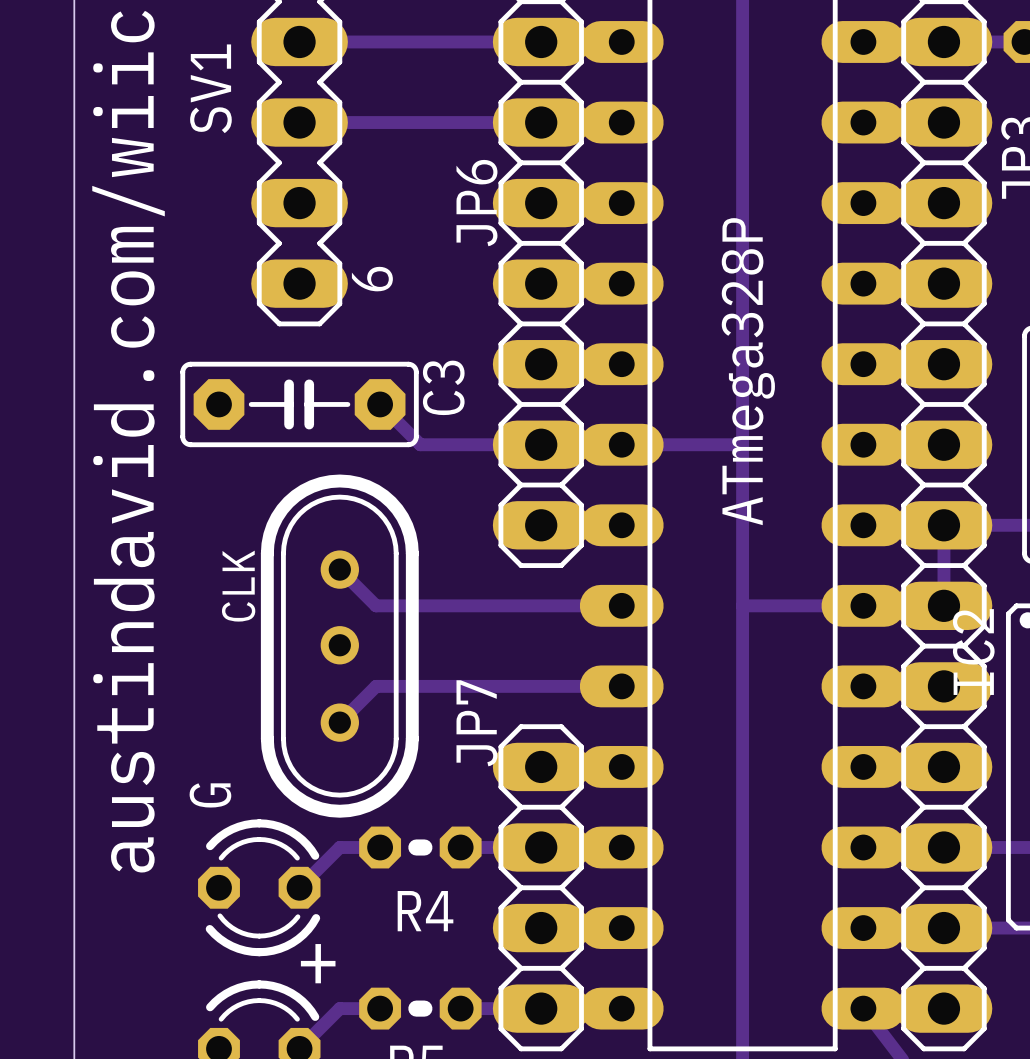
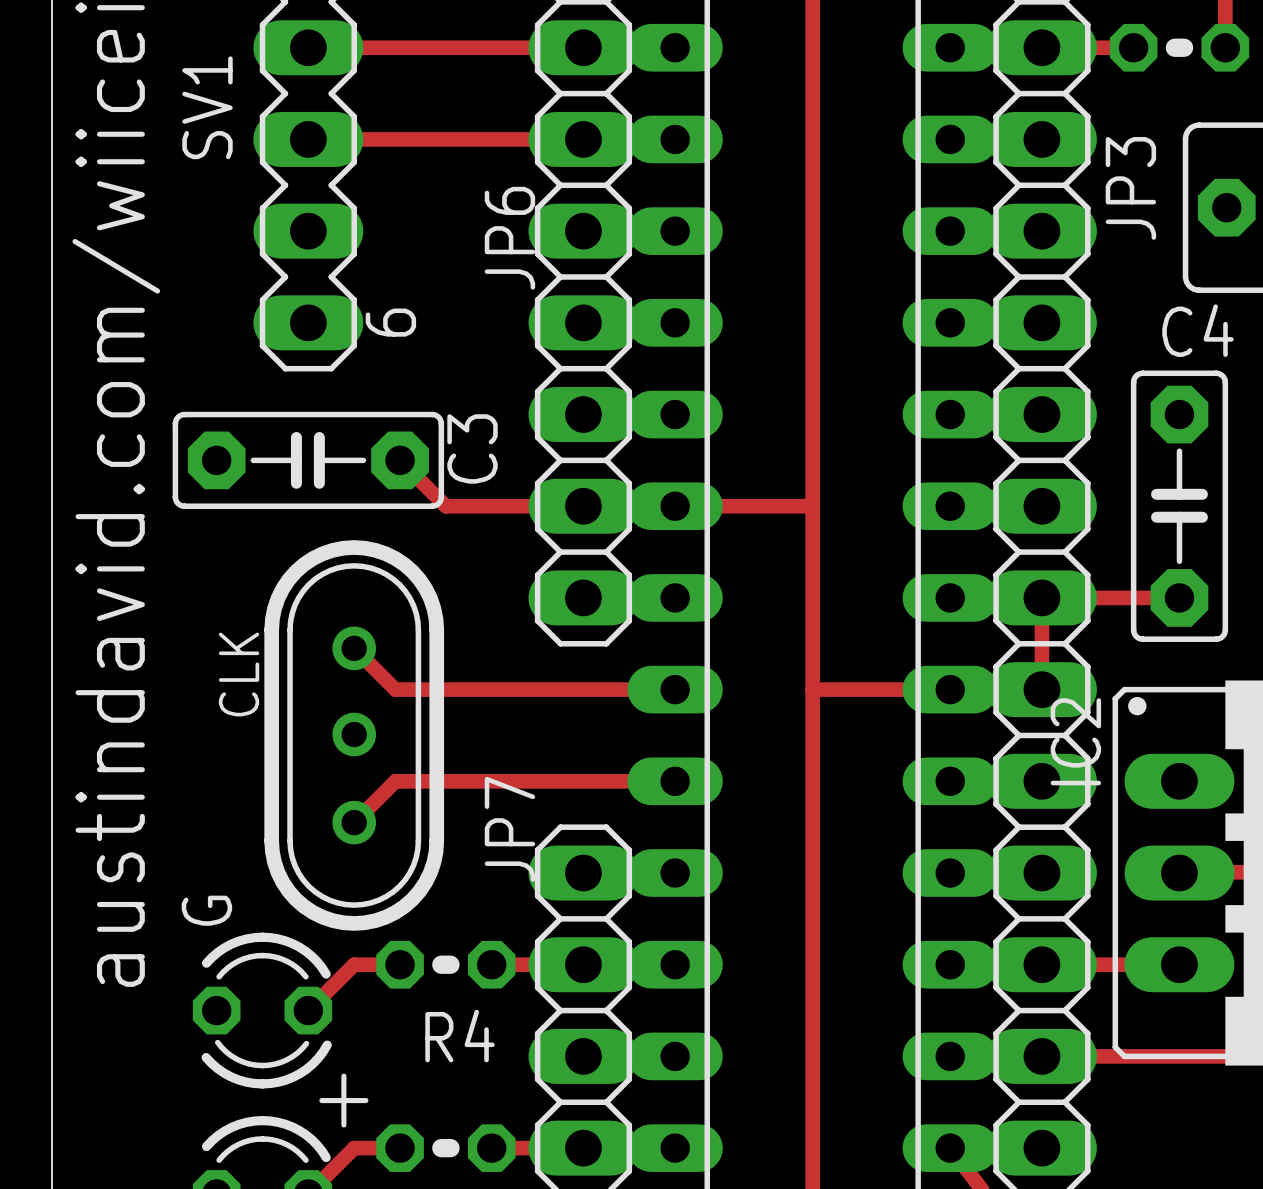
part value: ATmega328P (748, 371) -> none

